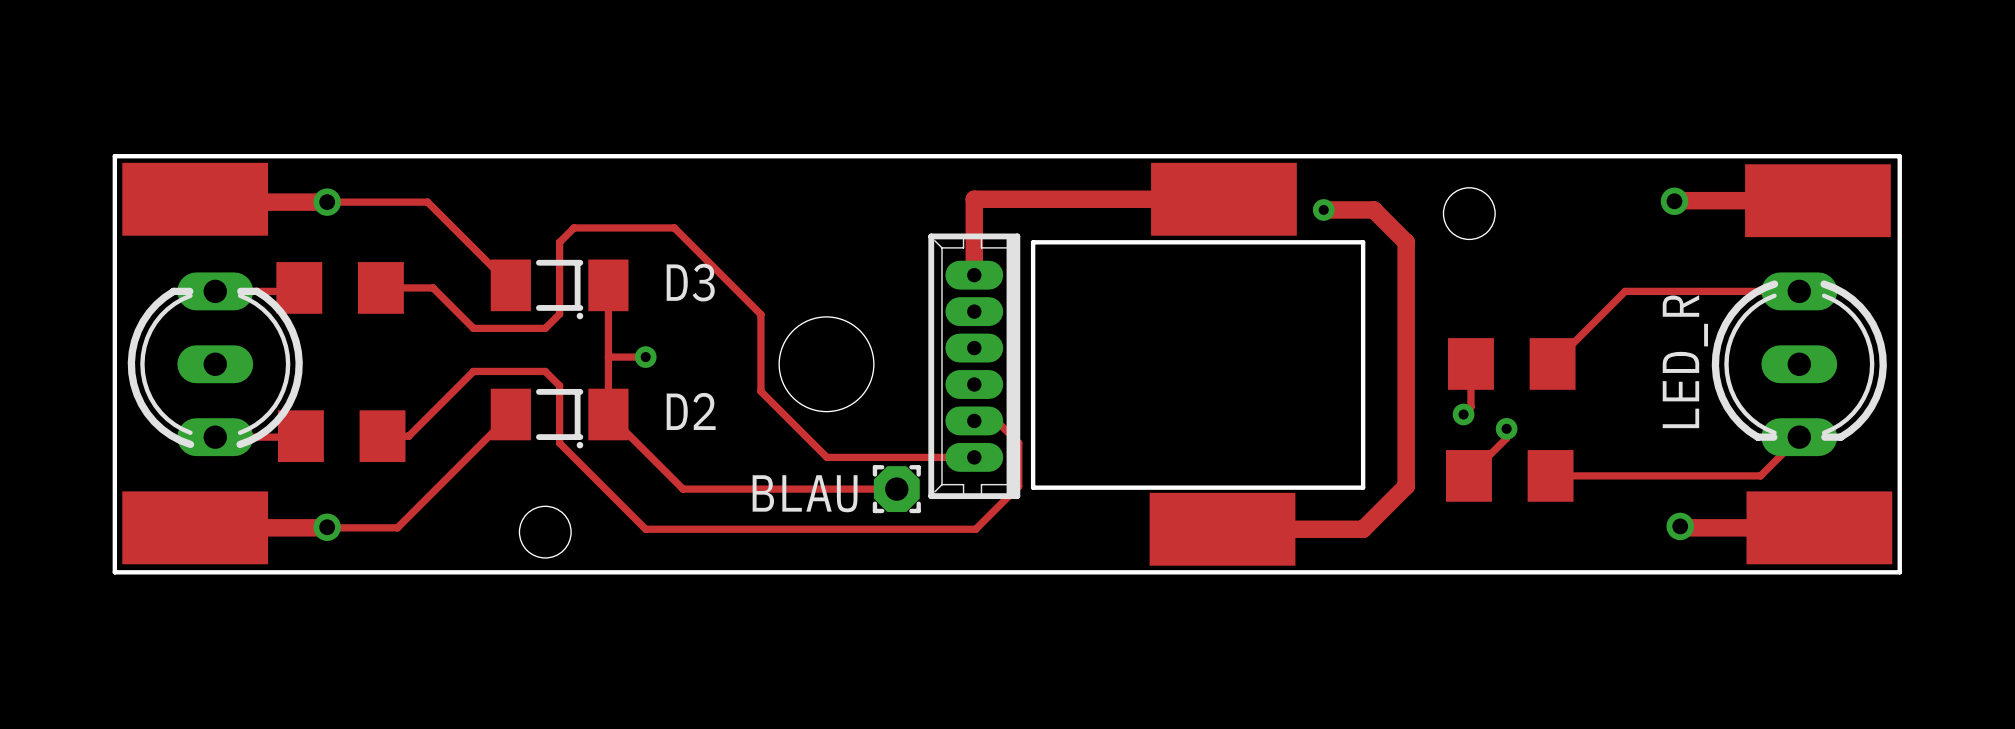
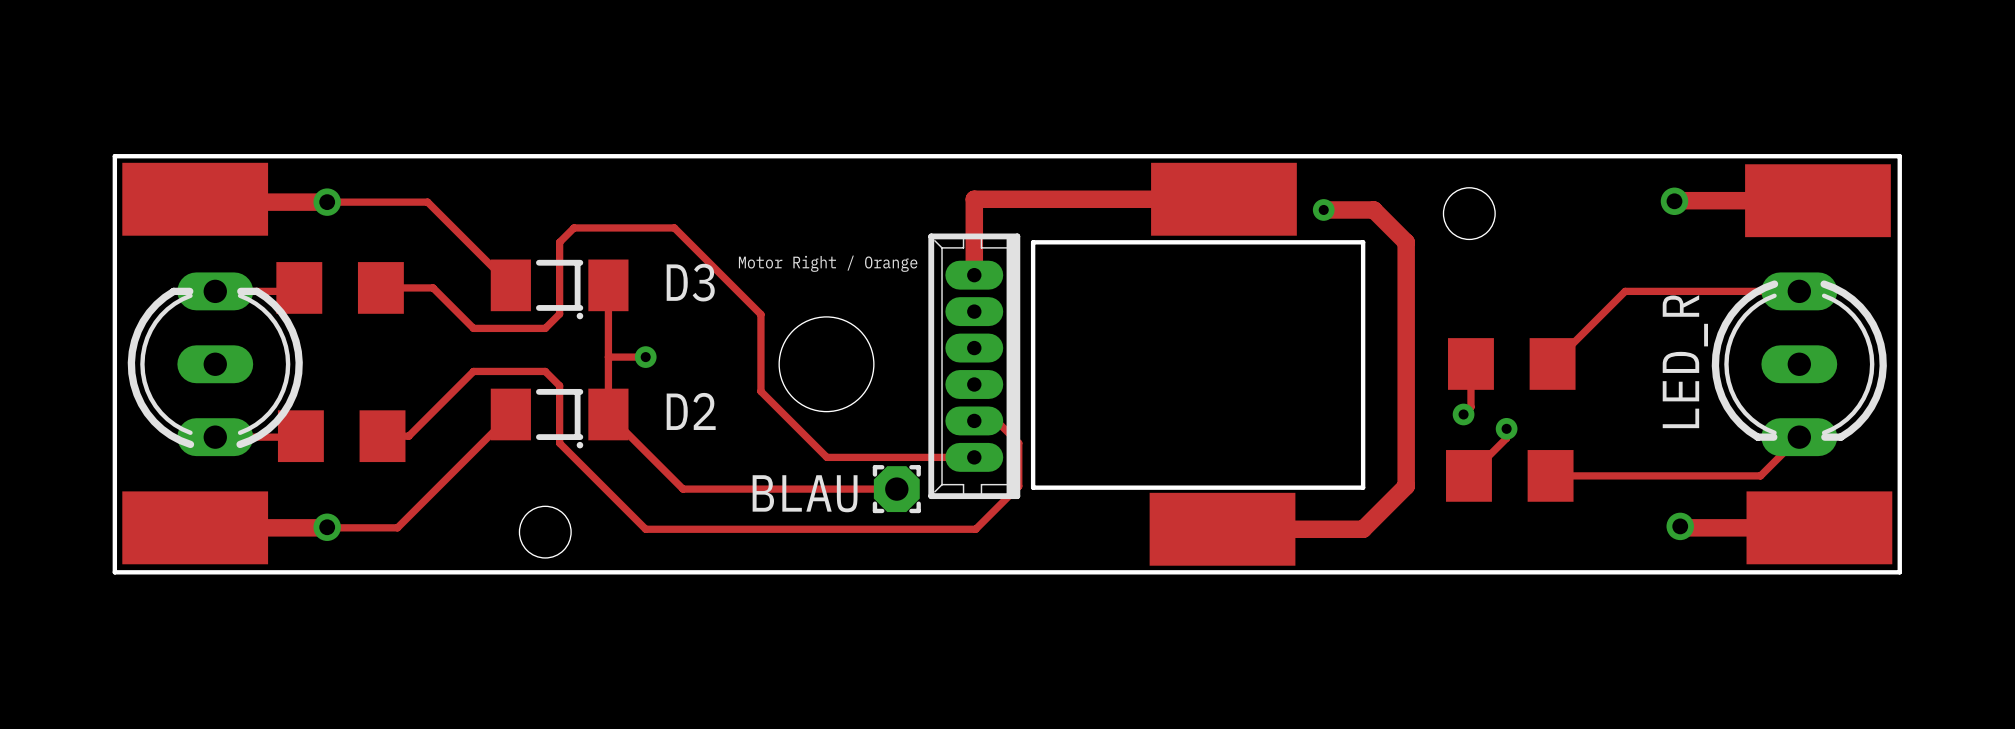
text: none -> Motor Right / Orange (828, 263)

